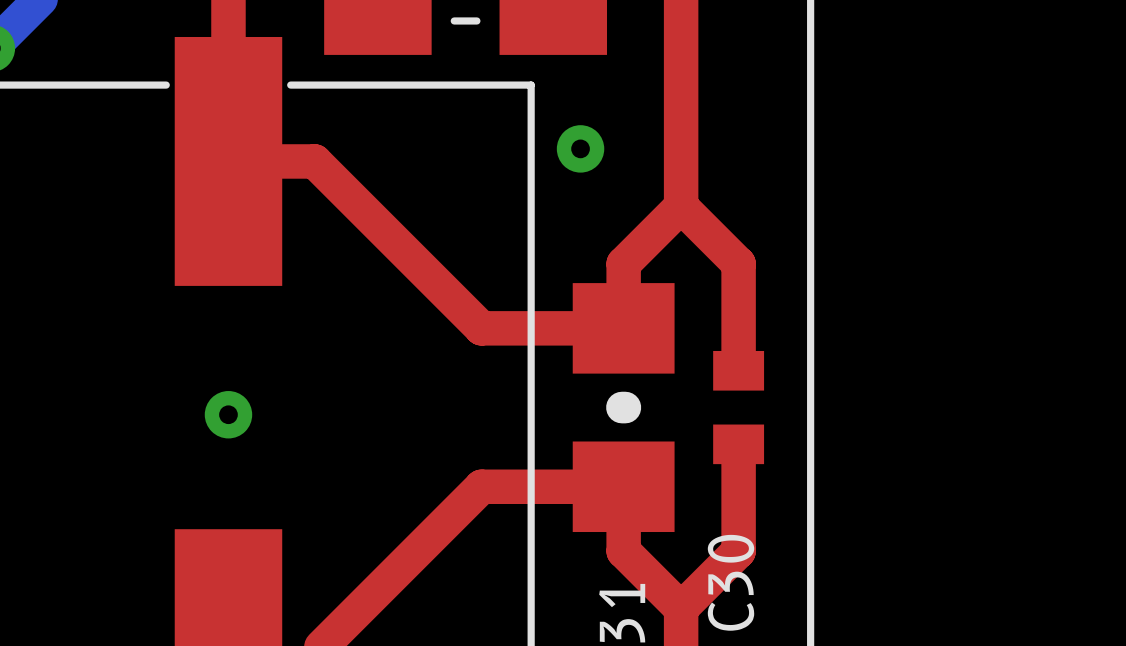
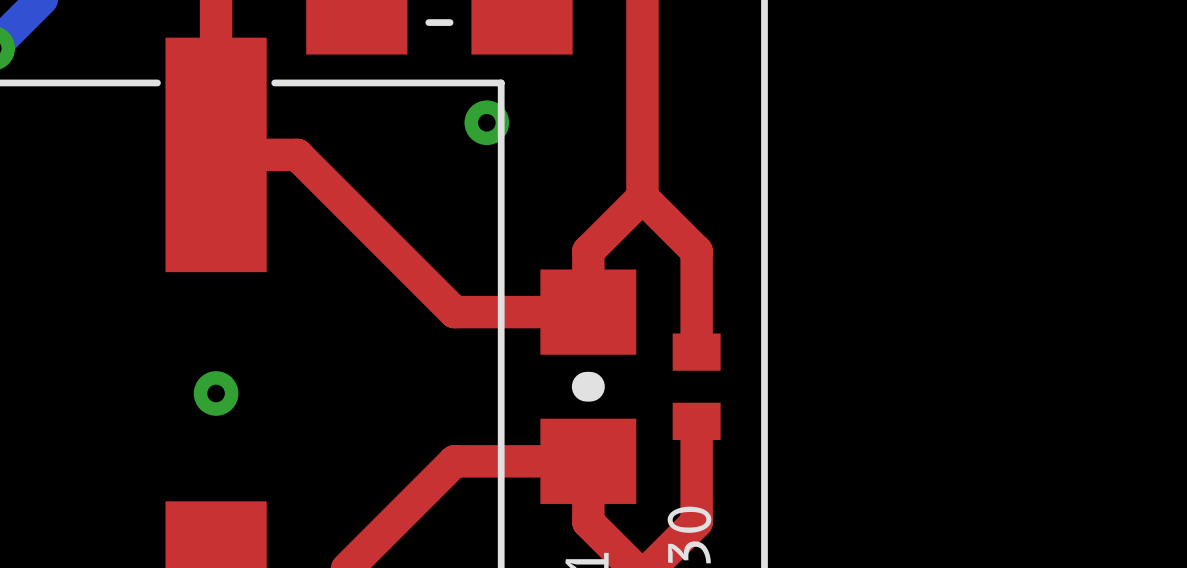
via position: (580, 148) -> (486, 122)

